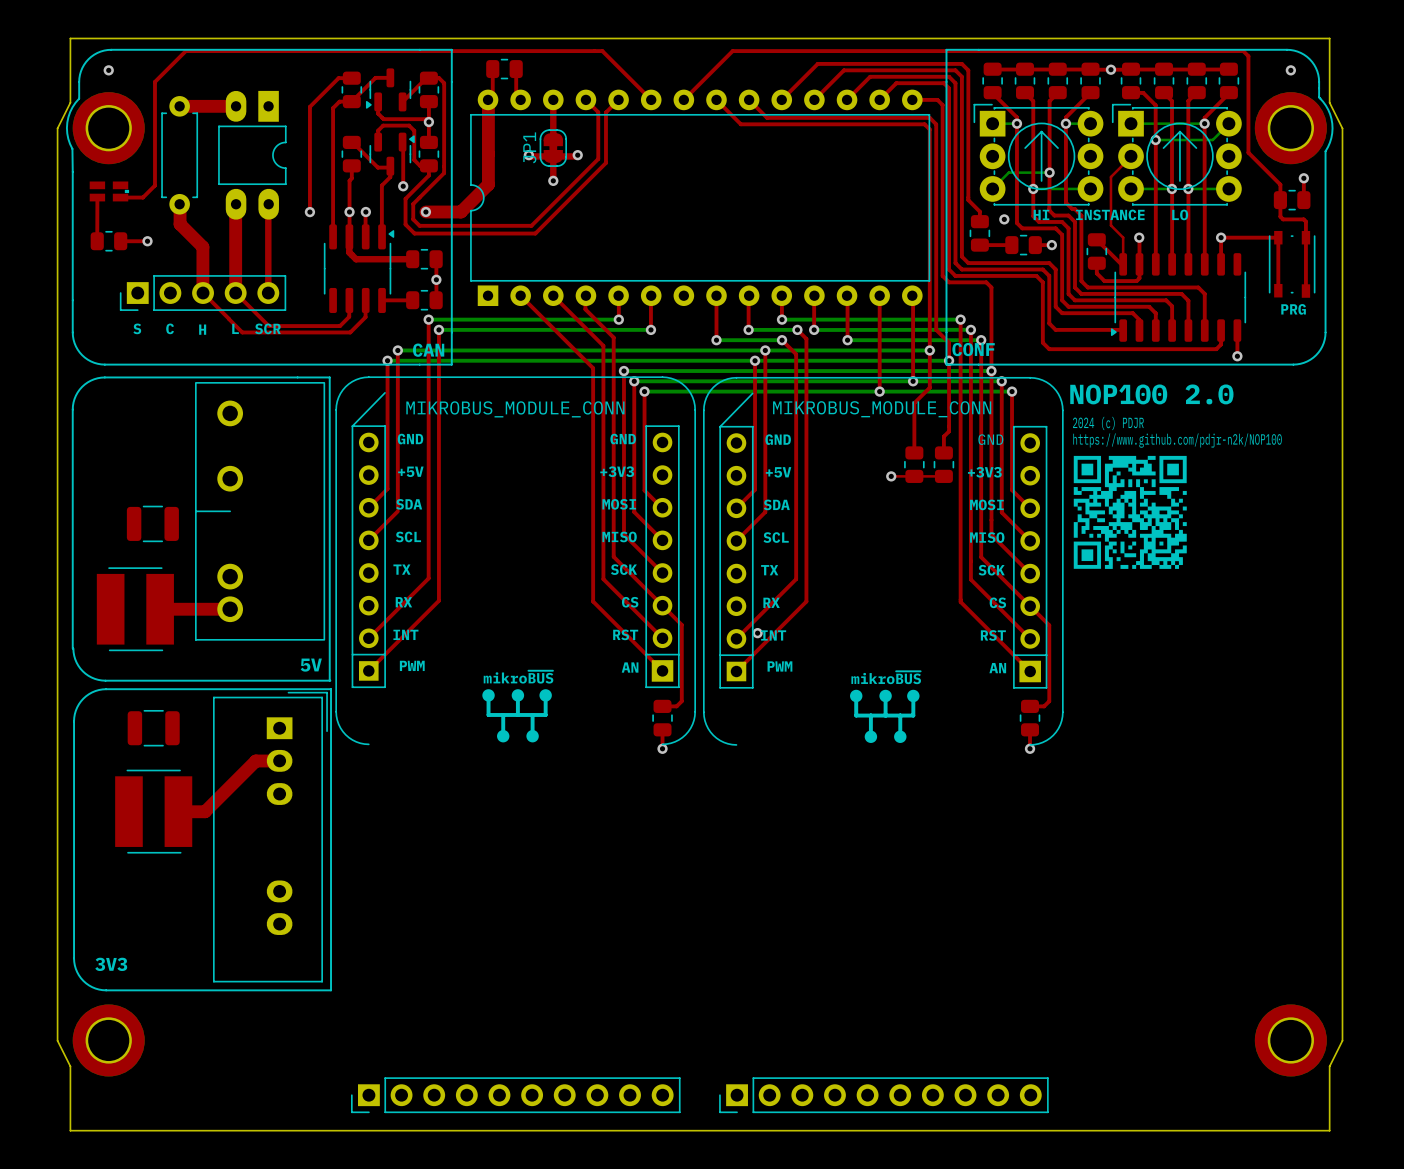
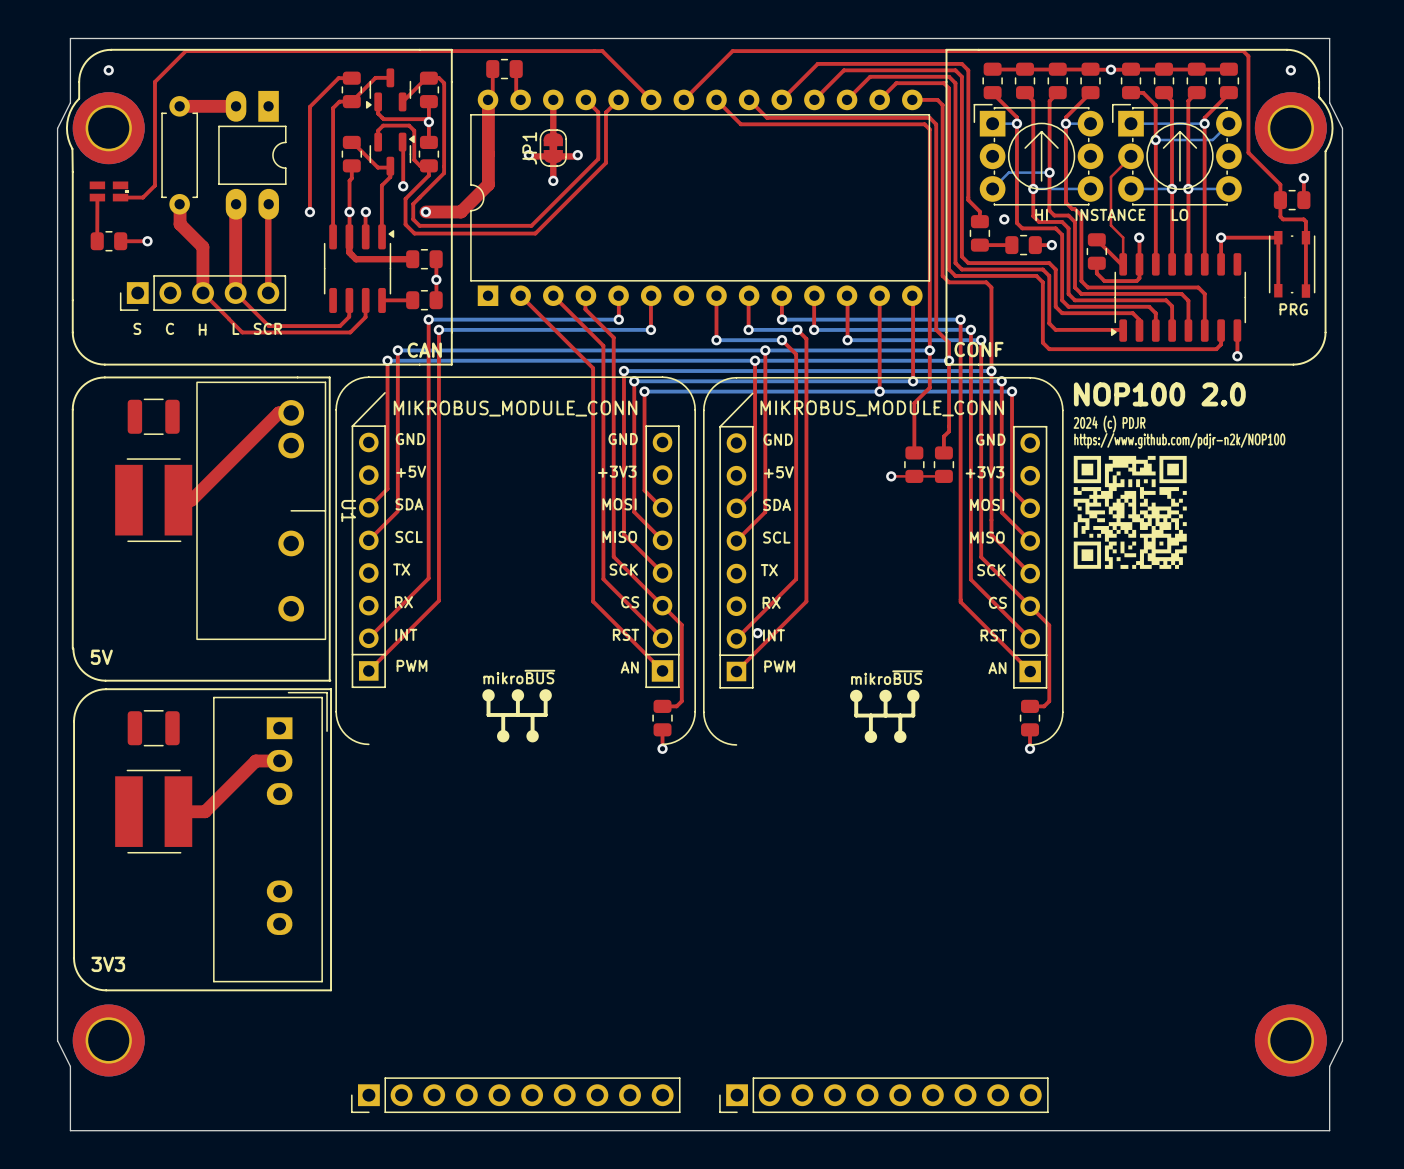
top track: none -> (291, 412) (278, 412) (191, 500) (184, 500)
U1: none -> (261, 510)
part: (260, 511) -> none
part position: (152, 523) -> (153, 416)
part position: (135, 609) -> (153, 500)
top track: (160, 609) (230, 609) -> none
text position: 5V (311, 665) -> 5V (101, 657)

